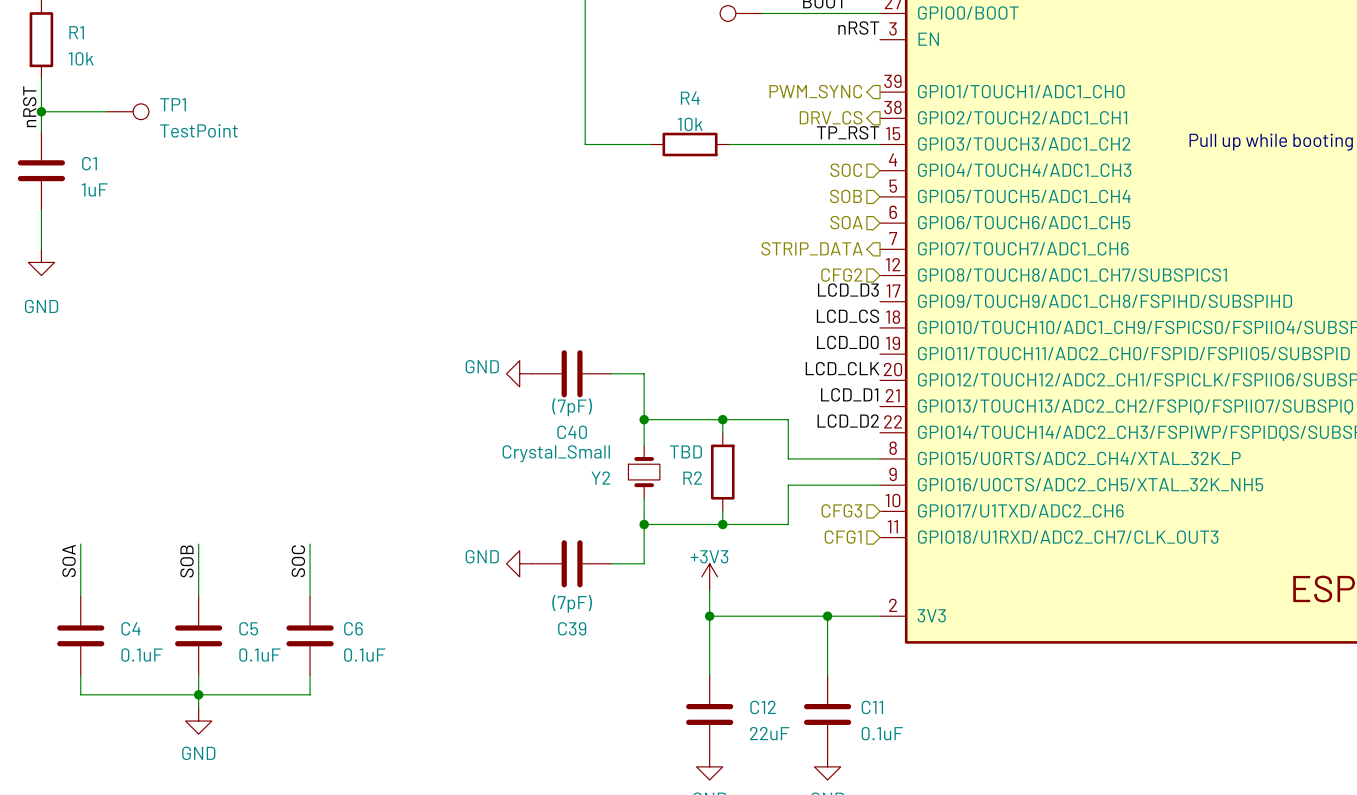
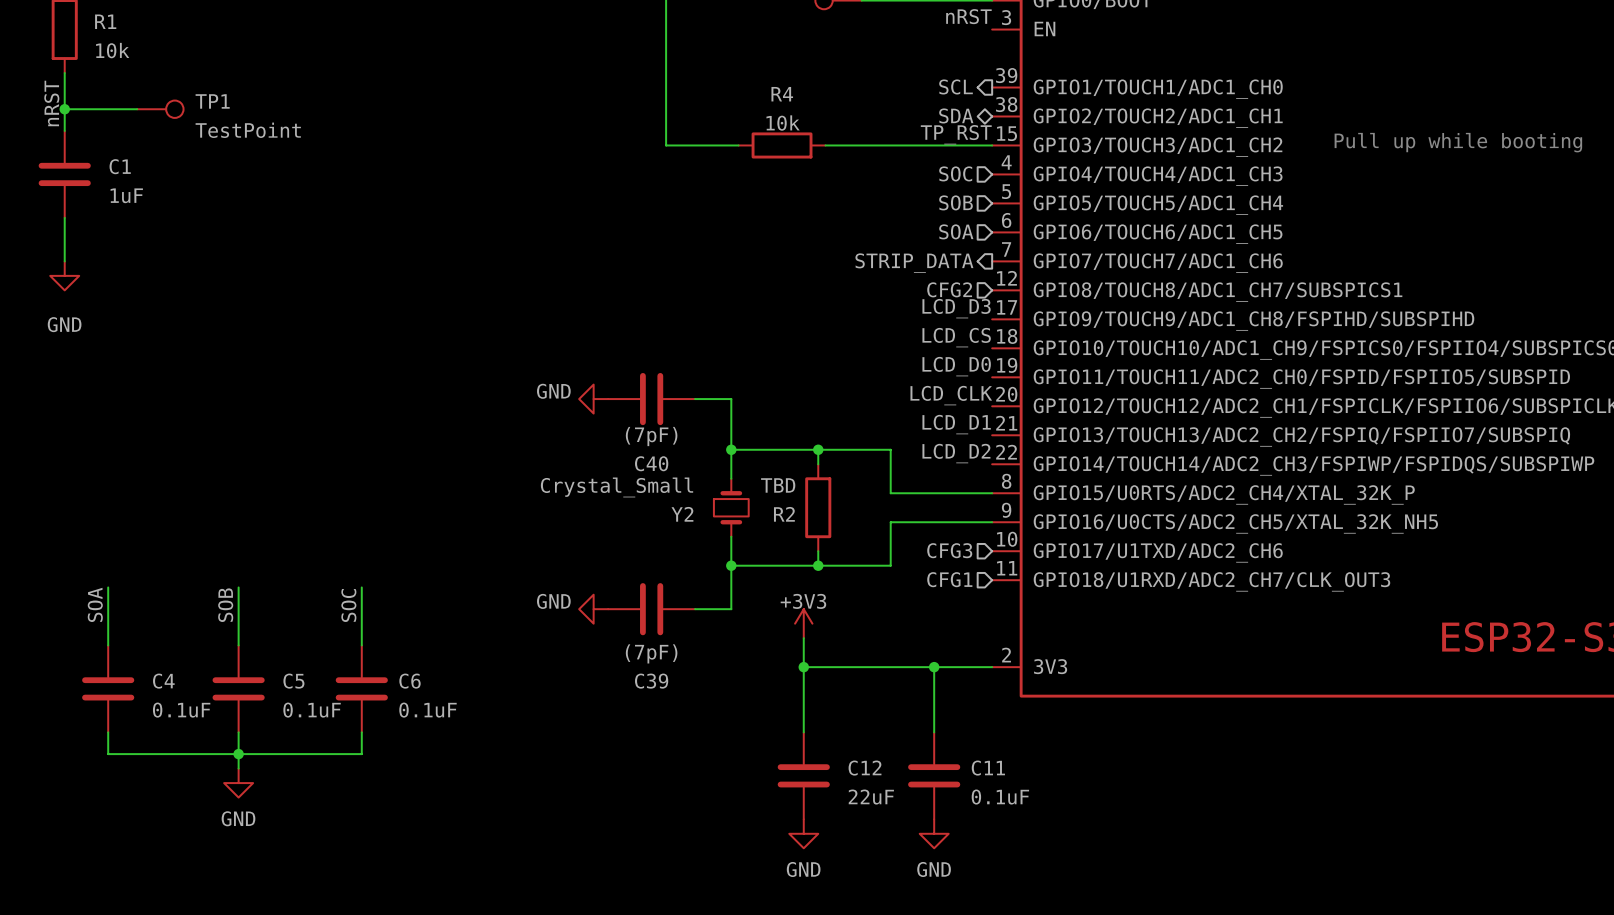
hierarchical label: PWM_SYNC (815, 91) -> SCL (956, 86)
hierarchical label shape: output (831, 117) -> bidirectional (956, 115)
hierarchical label: DRV_CS (831, 117) -> SDA (956, 115)

